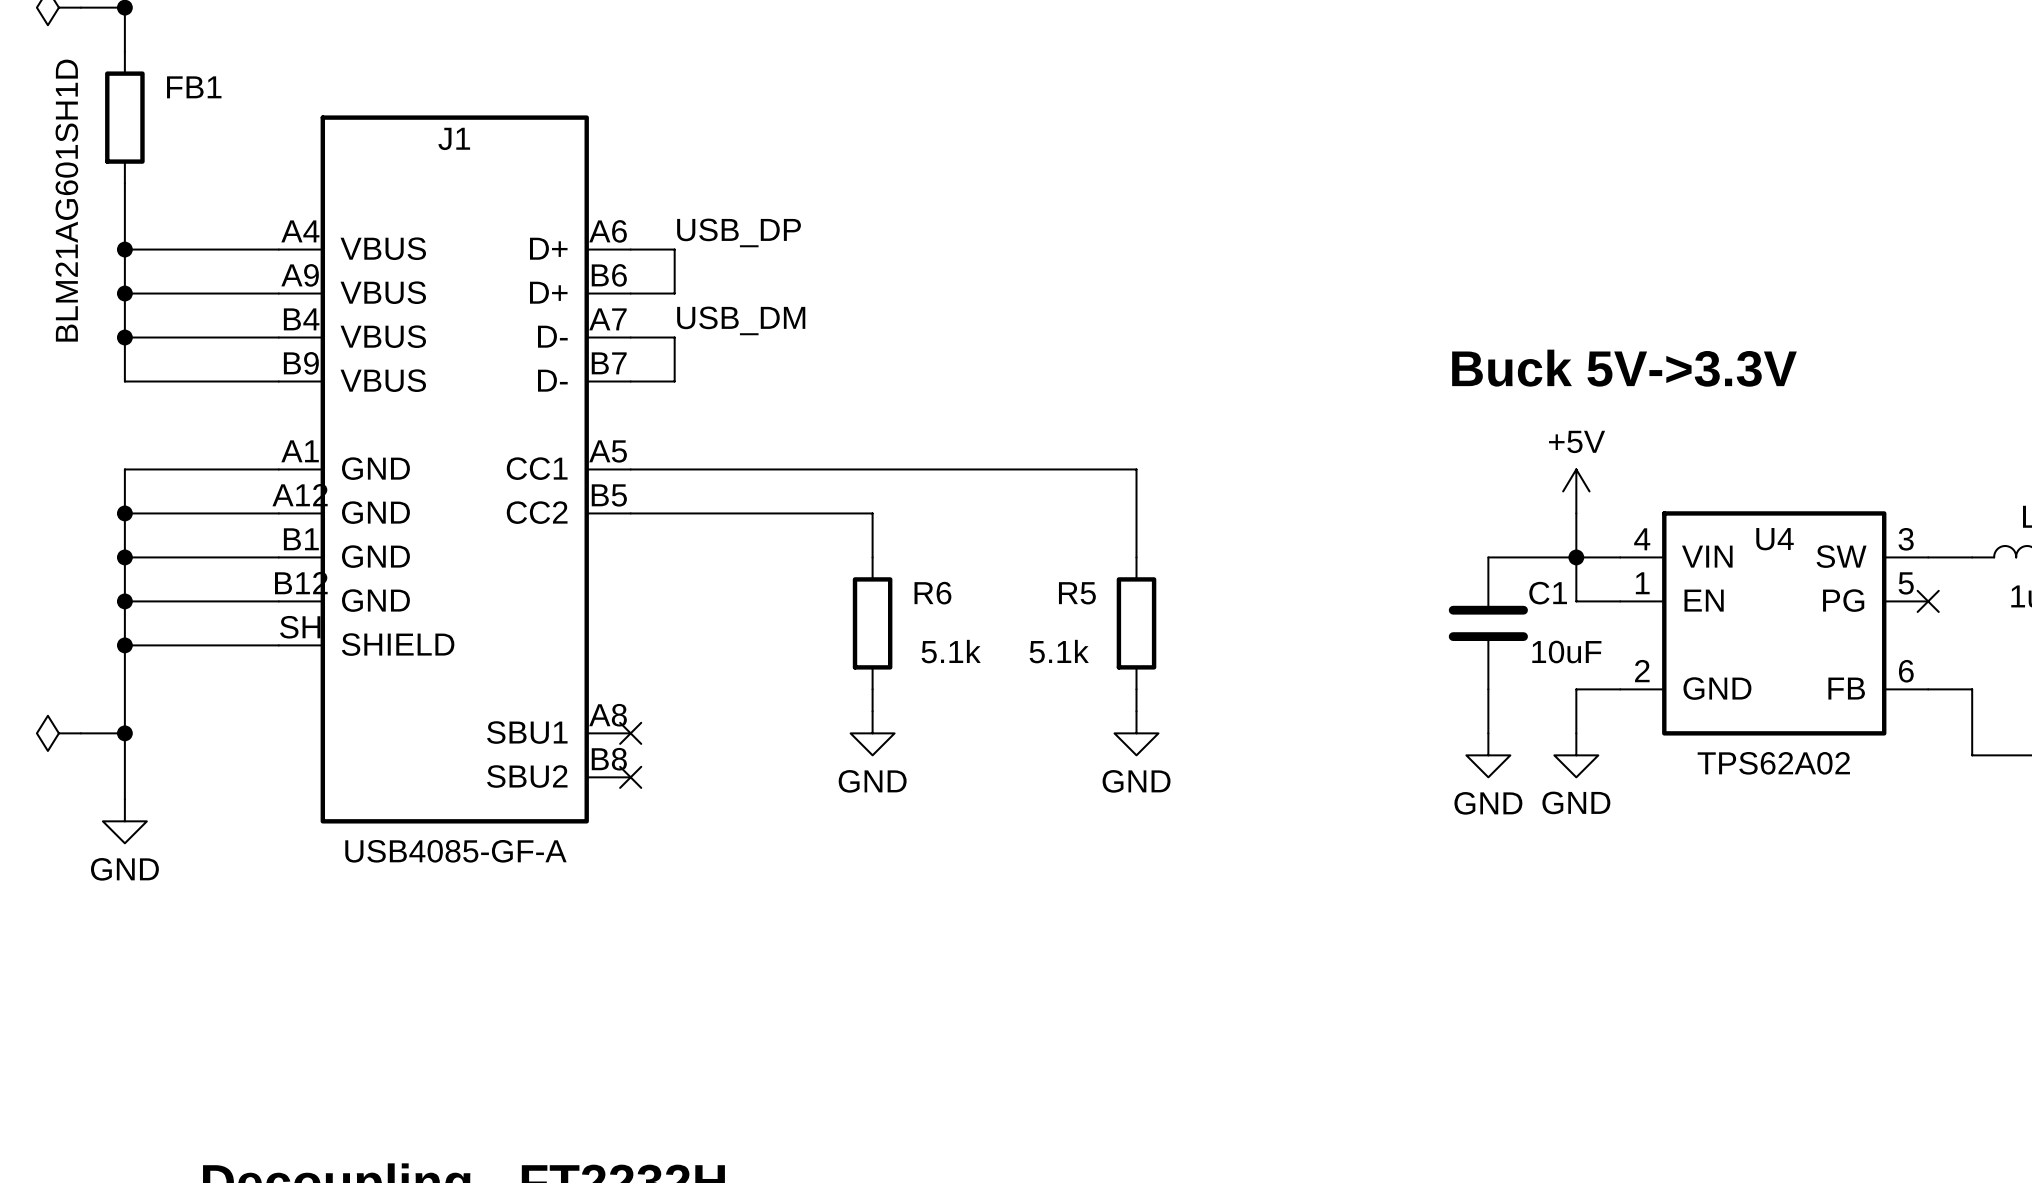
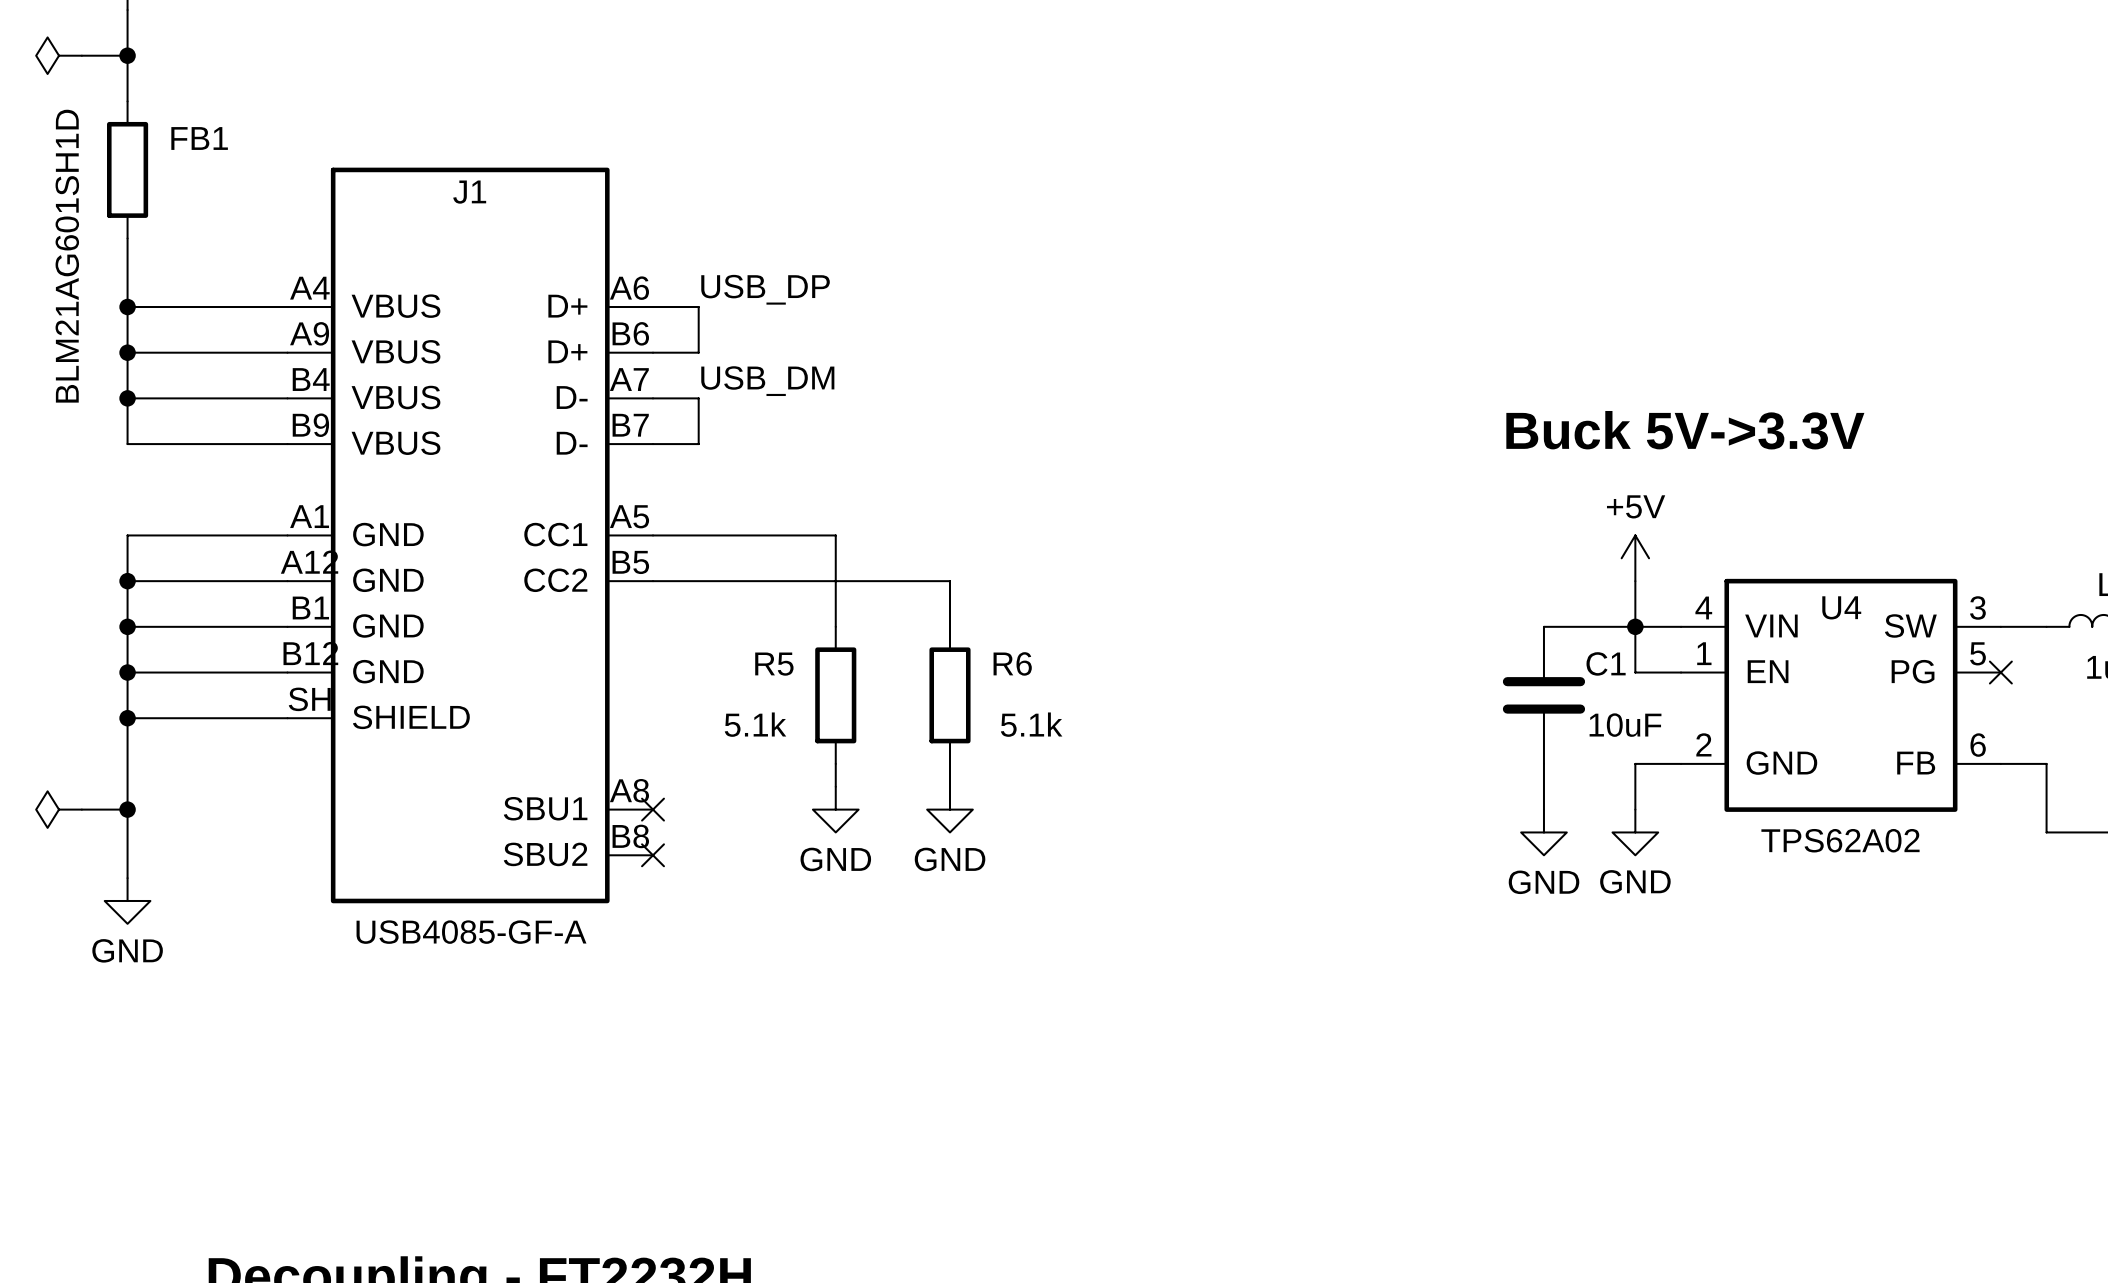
wire: (806, 469) (1136, 469) (1136, 557) -> (835, 535) (835, 626)
wire: (872, 513) (872, 557) -> (904, 581) (949, 581) (949, 626)
R6 position: (872, 623) -> (949, 695)
R5 position: (1136, 623) -> (835, 695)
wire: (872, 689) (872, 711) -> (949, 763) (949, 786)
wire: (1136, 689) (1136, 711) -> (835, 763) (835, 786)
power symbol: none -> GND (835, 809)
power symbol: GND (872, 733) -> none
power symbol: none -> GND (949, 809)
power symbol: GND (1136, 733) -> none

